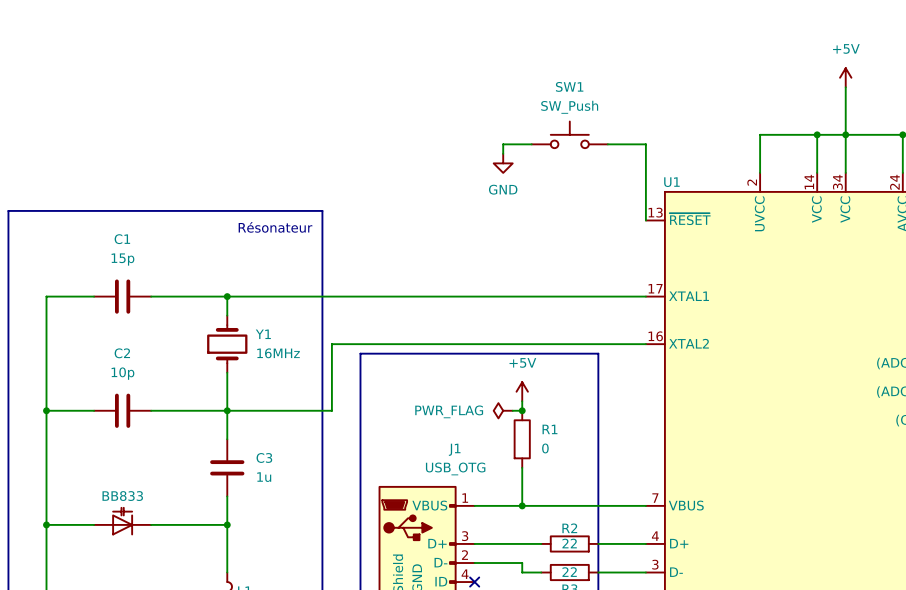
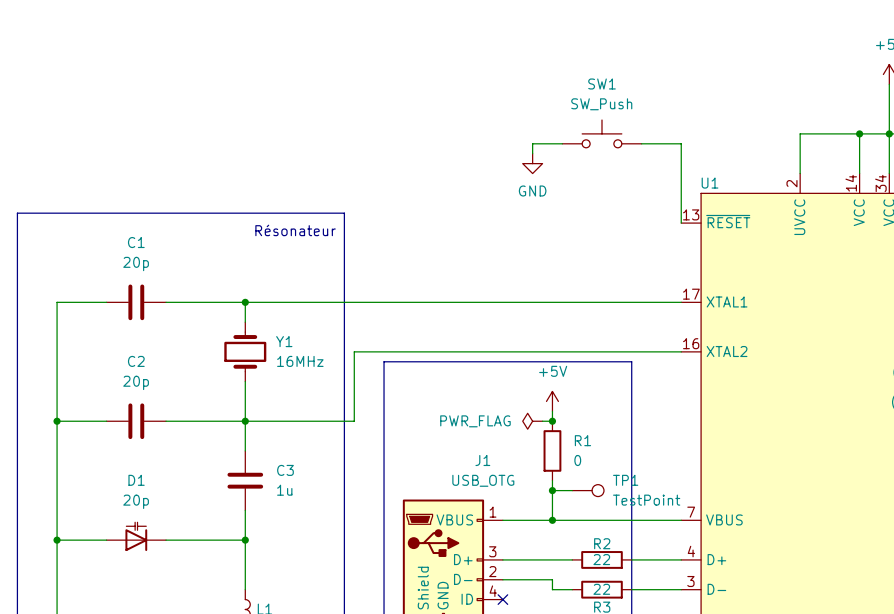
C1 value: 15p (122, 259) -> 20p (136, 263)
C2 value: 10p (122, 373) -> 20p (136, 382)
wire: none -> (552, 490) (572, 490)
junction: none -> (552, 490)
TP1: none -> TestPoint (588, 490)
BB833 value: none -> 20p (136, 501)
BB833 name: BB833 (122, 496) -> D1 (136, 480)

